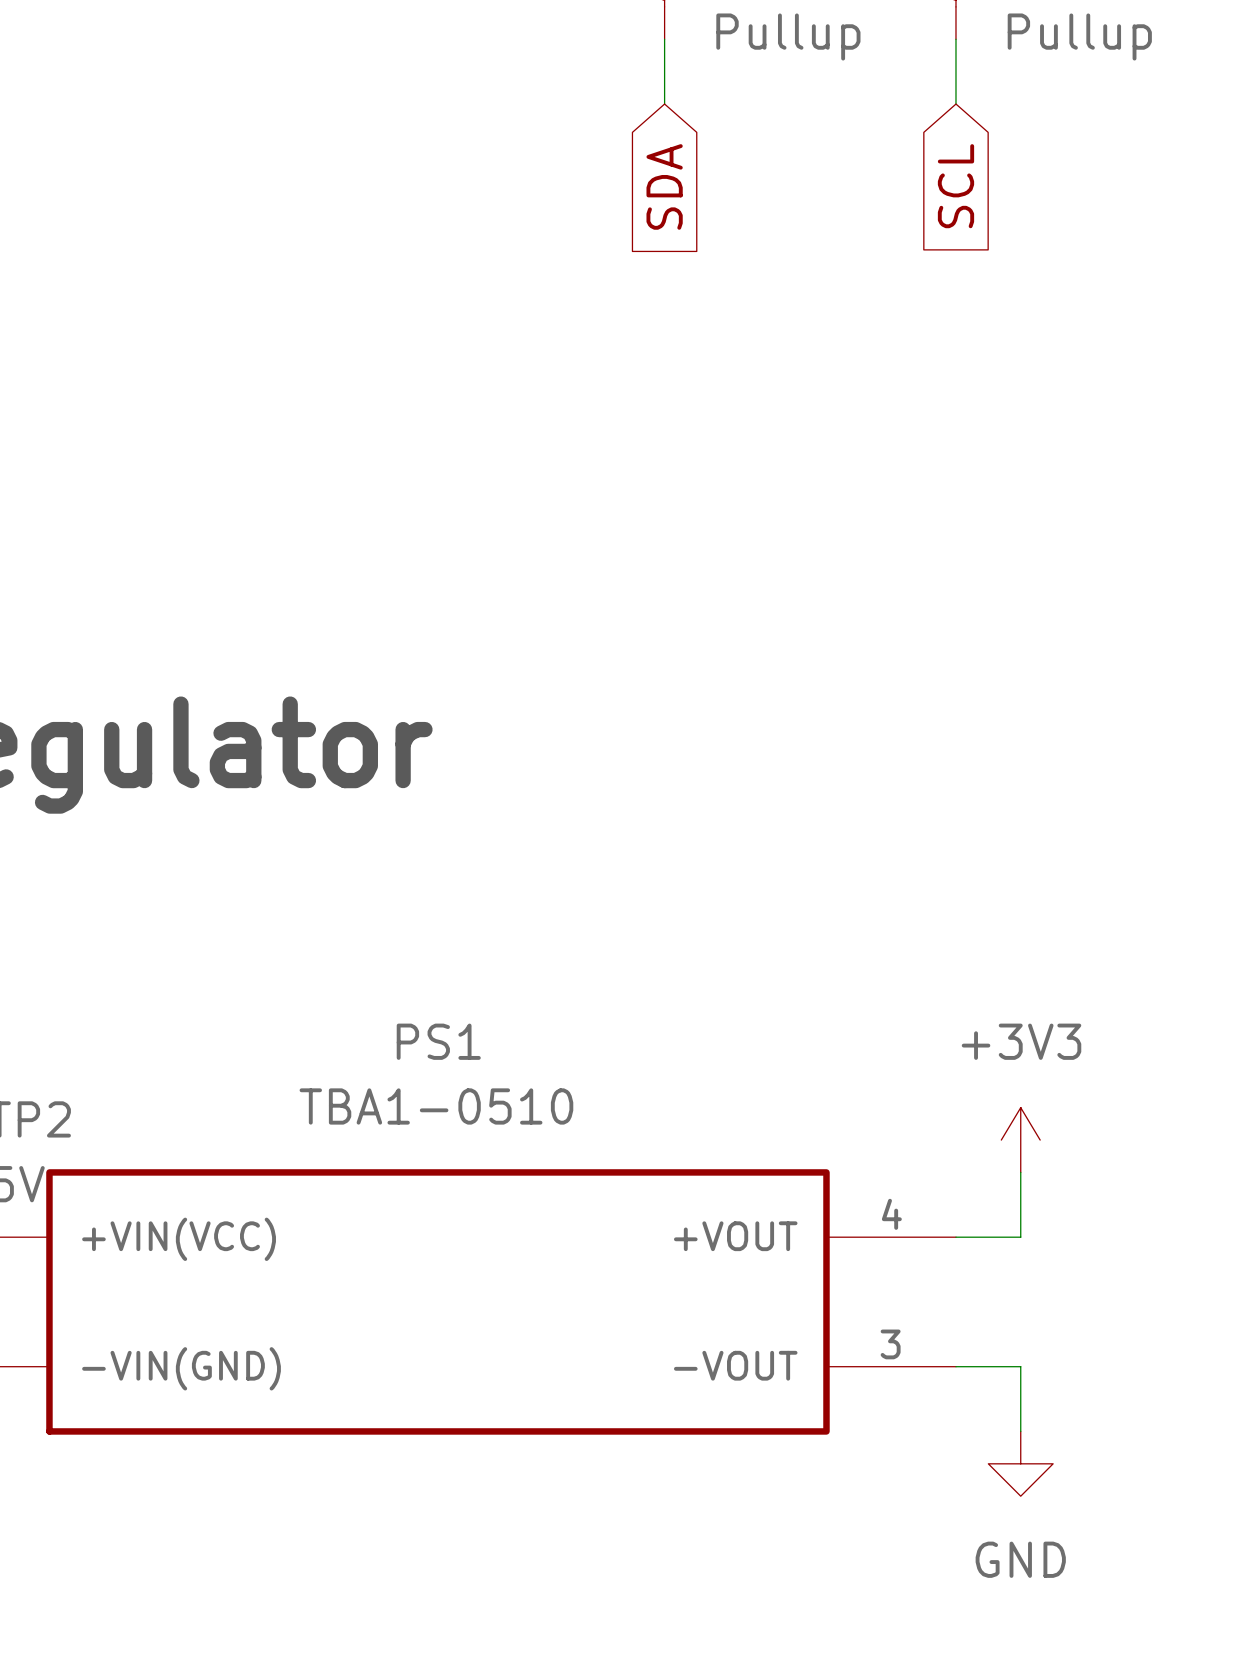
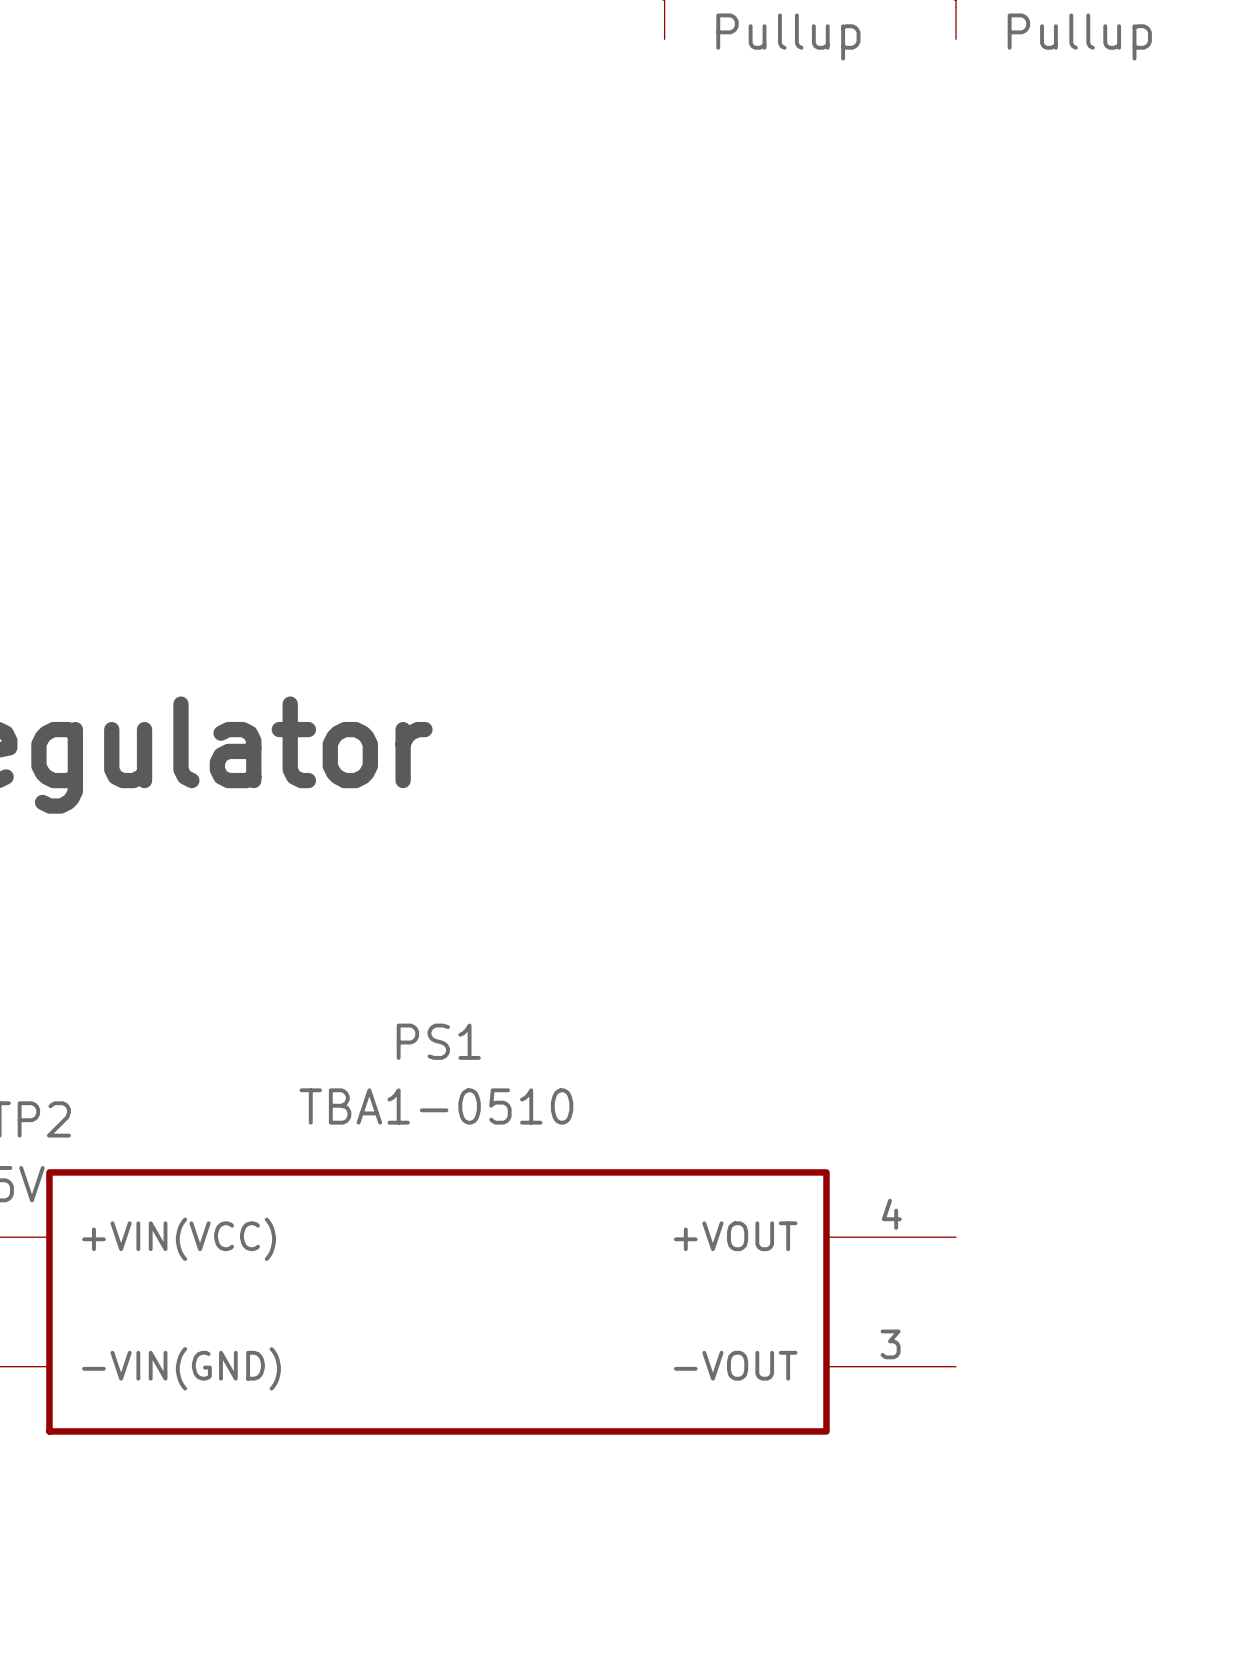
wire: (664, 39) (664, 104) -> none
wire: (955, 39) (955, 104) -> none
global label: SDA (664, 186) -> none
global label: SCL (955, 186) -> none
power symbol: +3V3 (1020, 1140) -> none
wire: (1020, 1172) (1020, 1237) (955, 1237) -> none
wire: (955, 1366) (1020, 1366) (1020, 1431) -> none
power symbol: GND (1020, 1463) -> none

